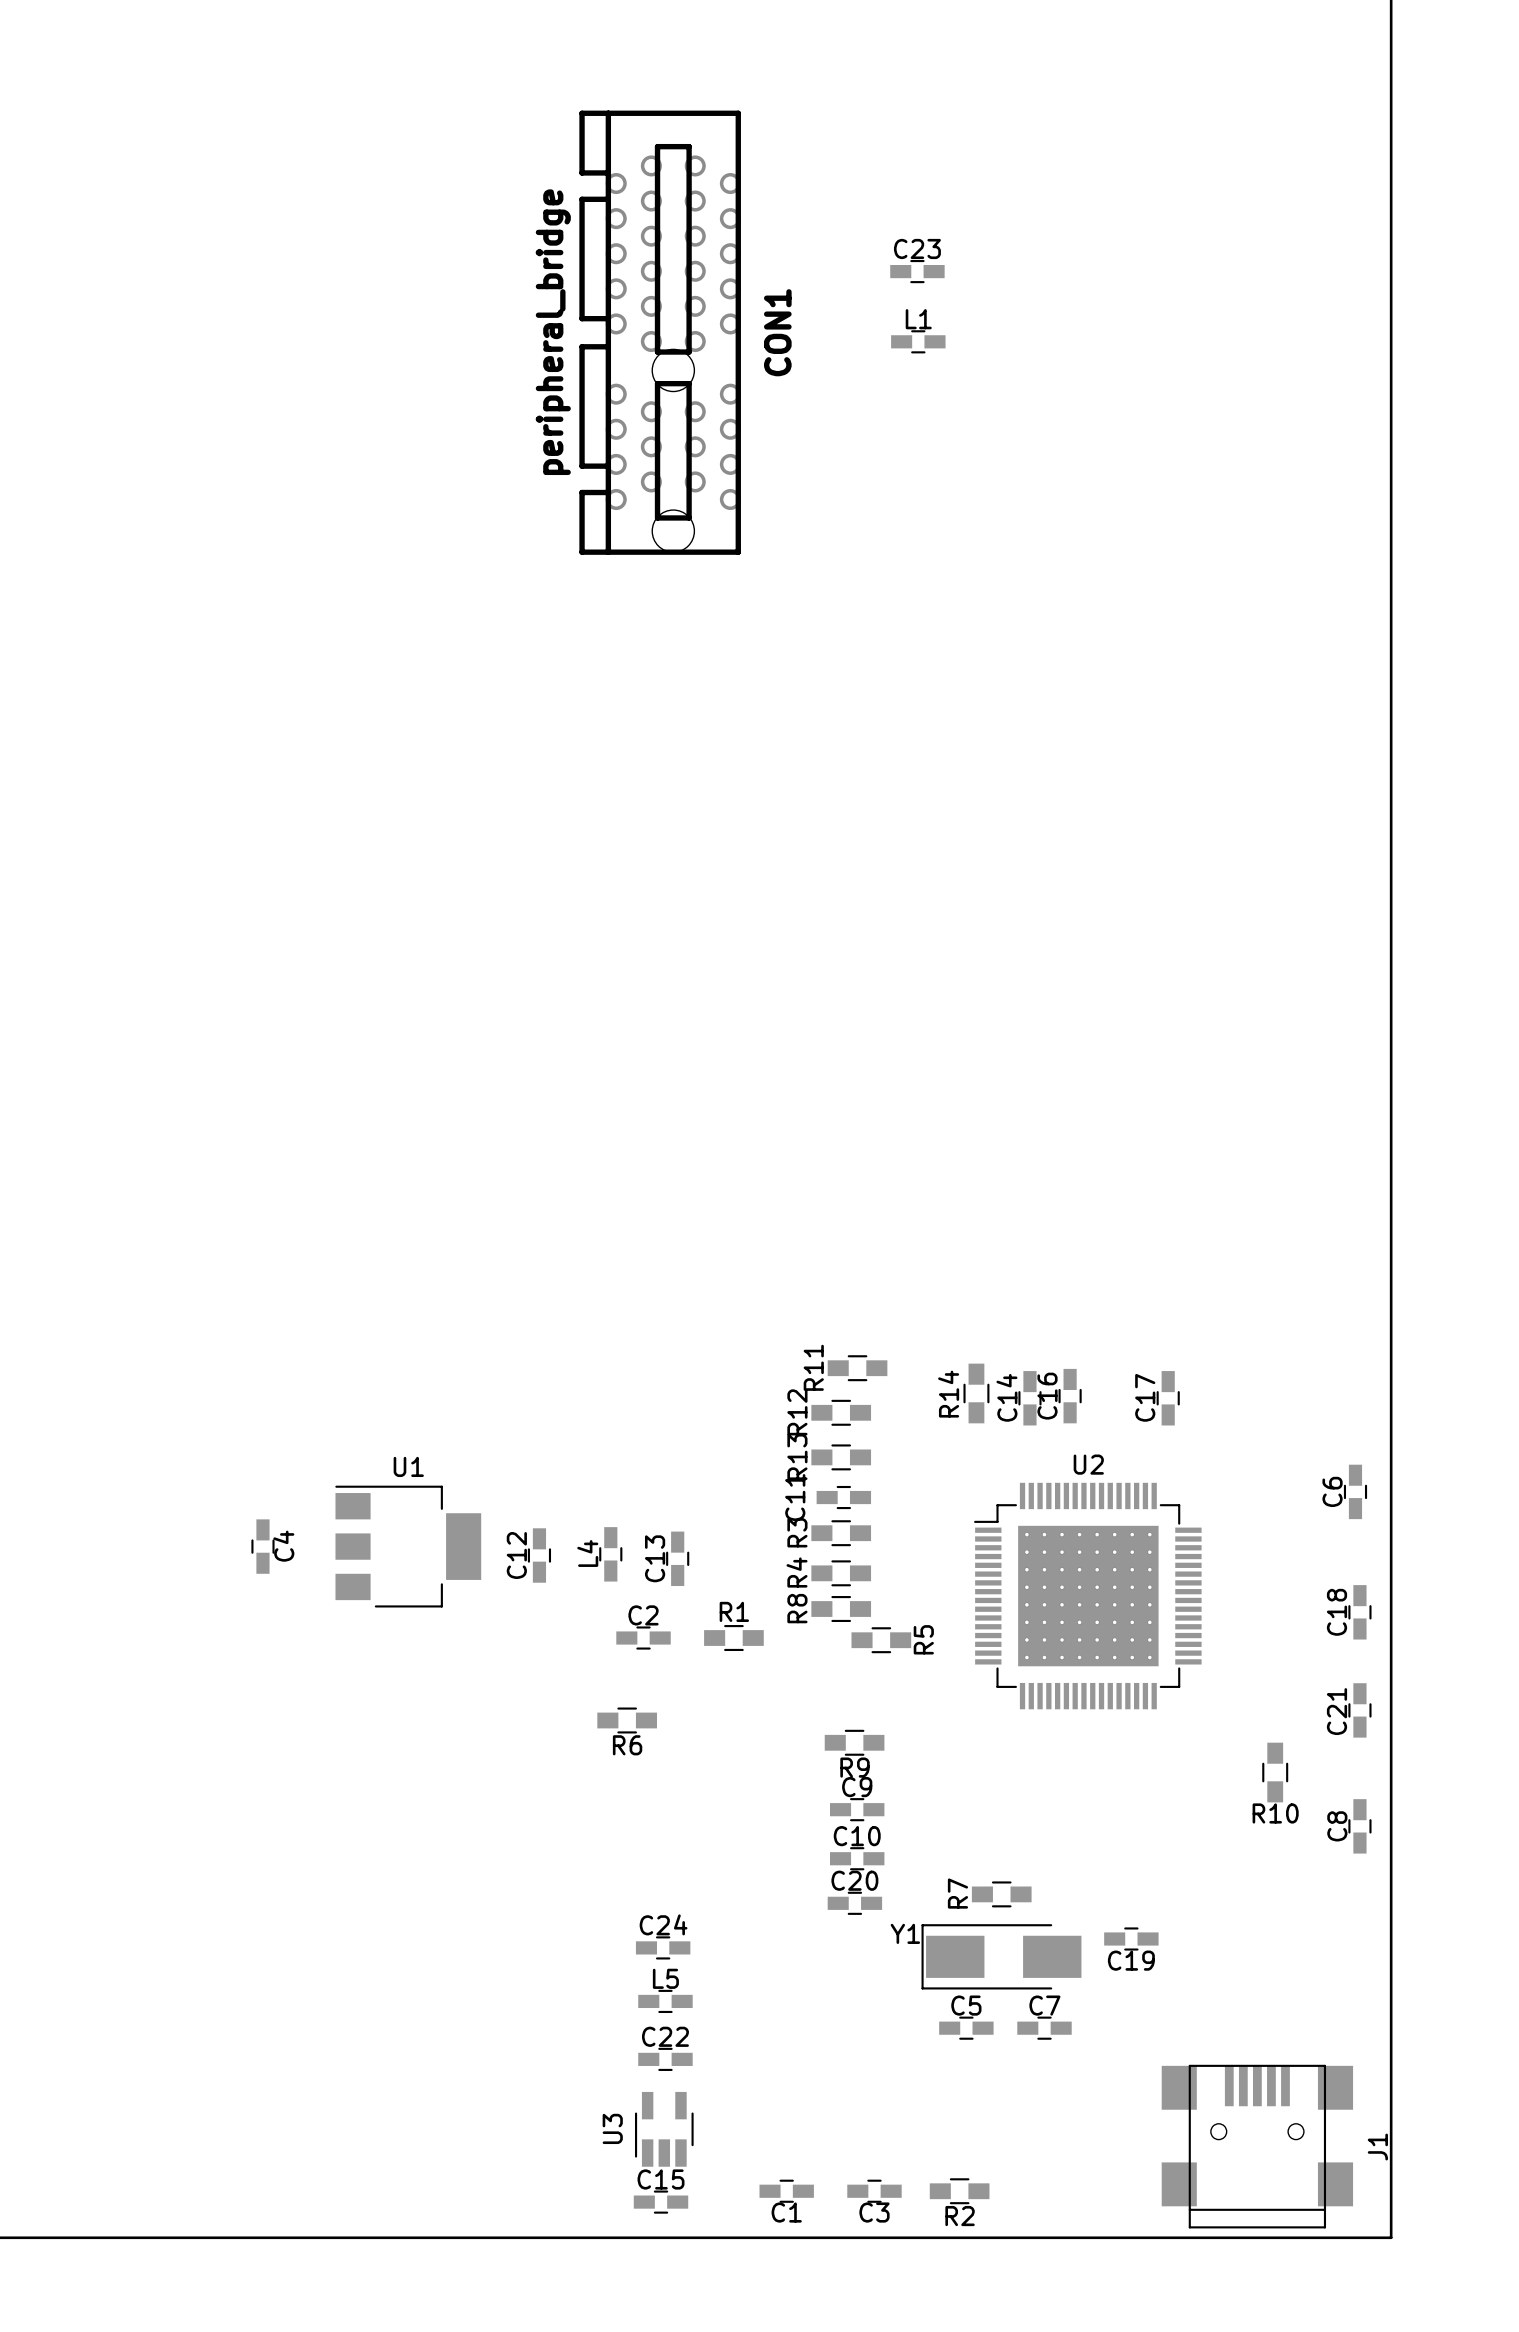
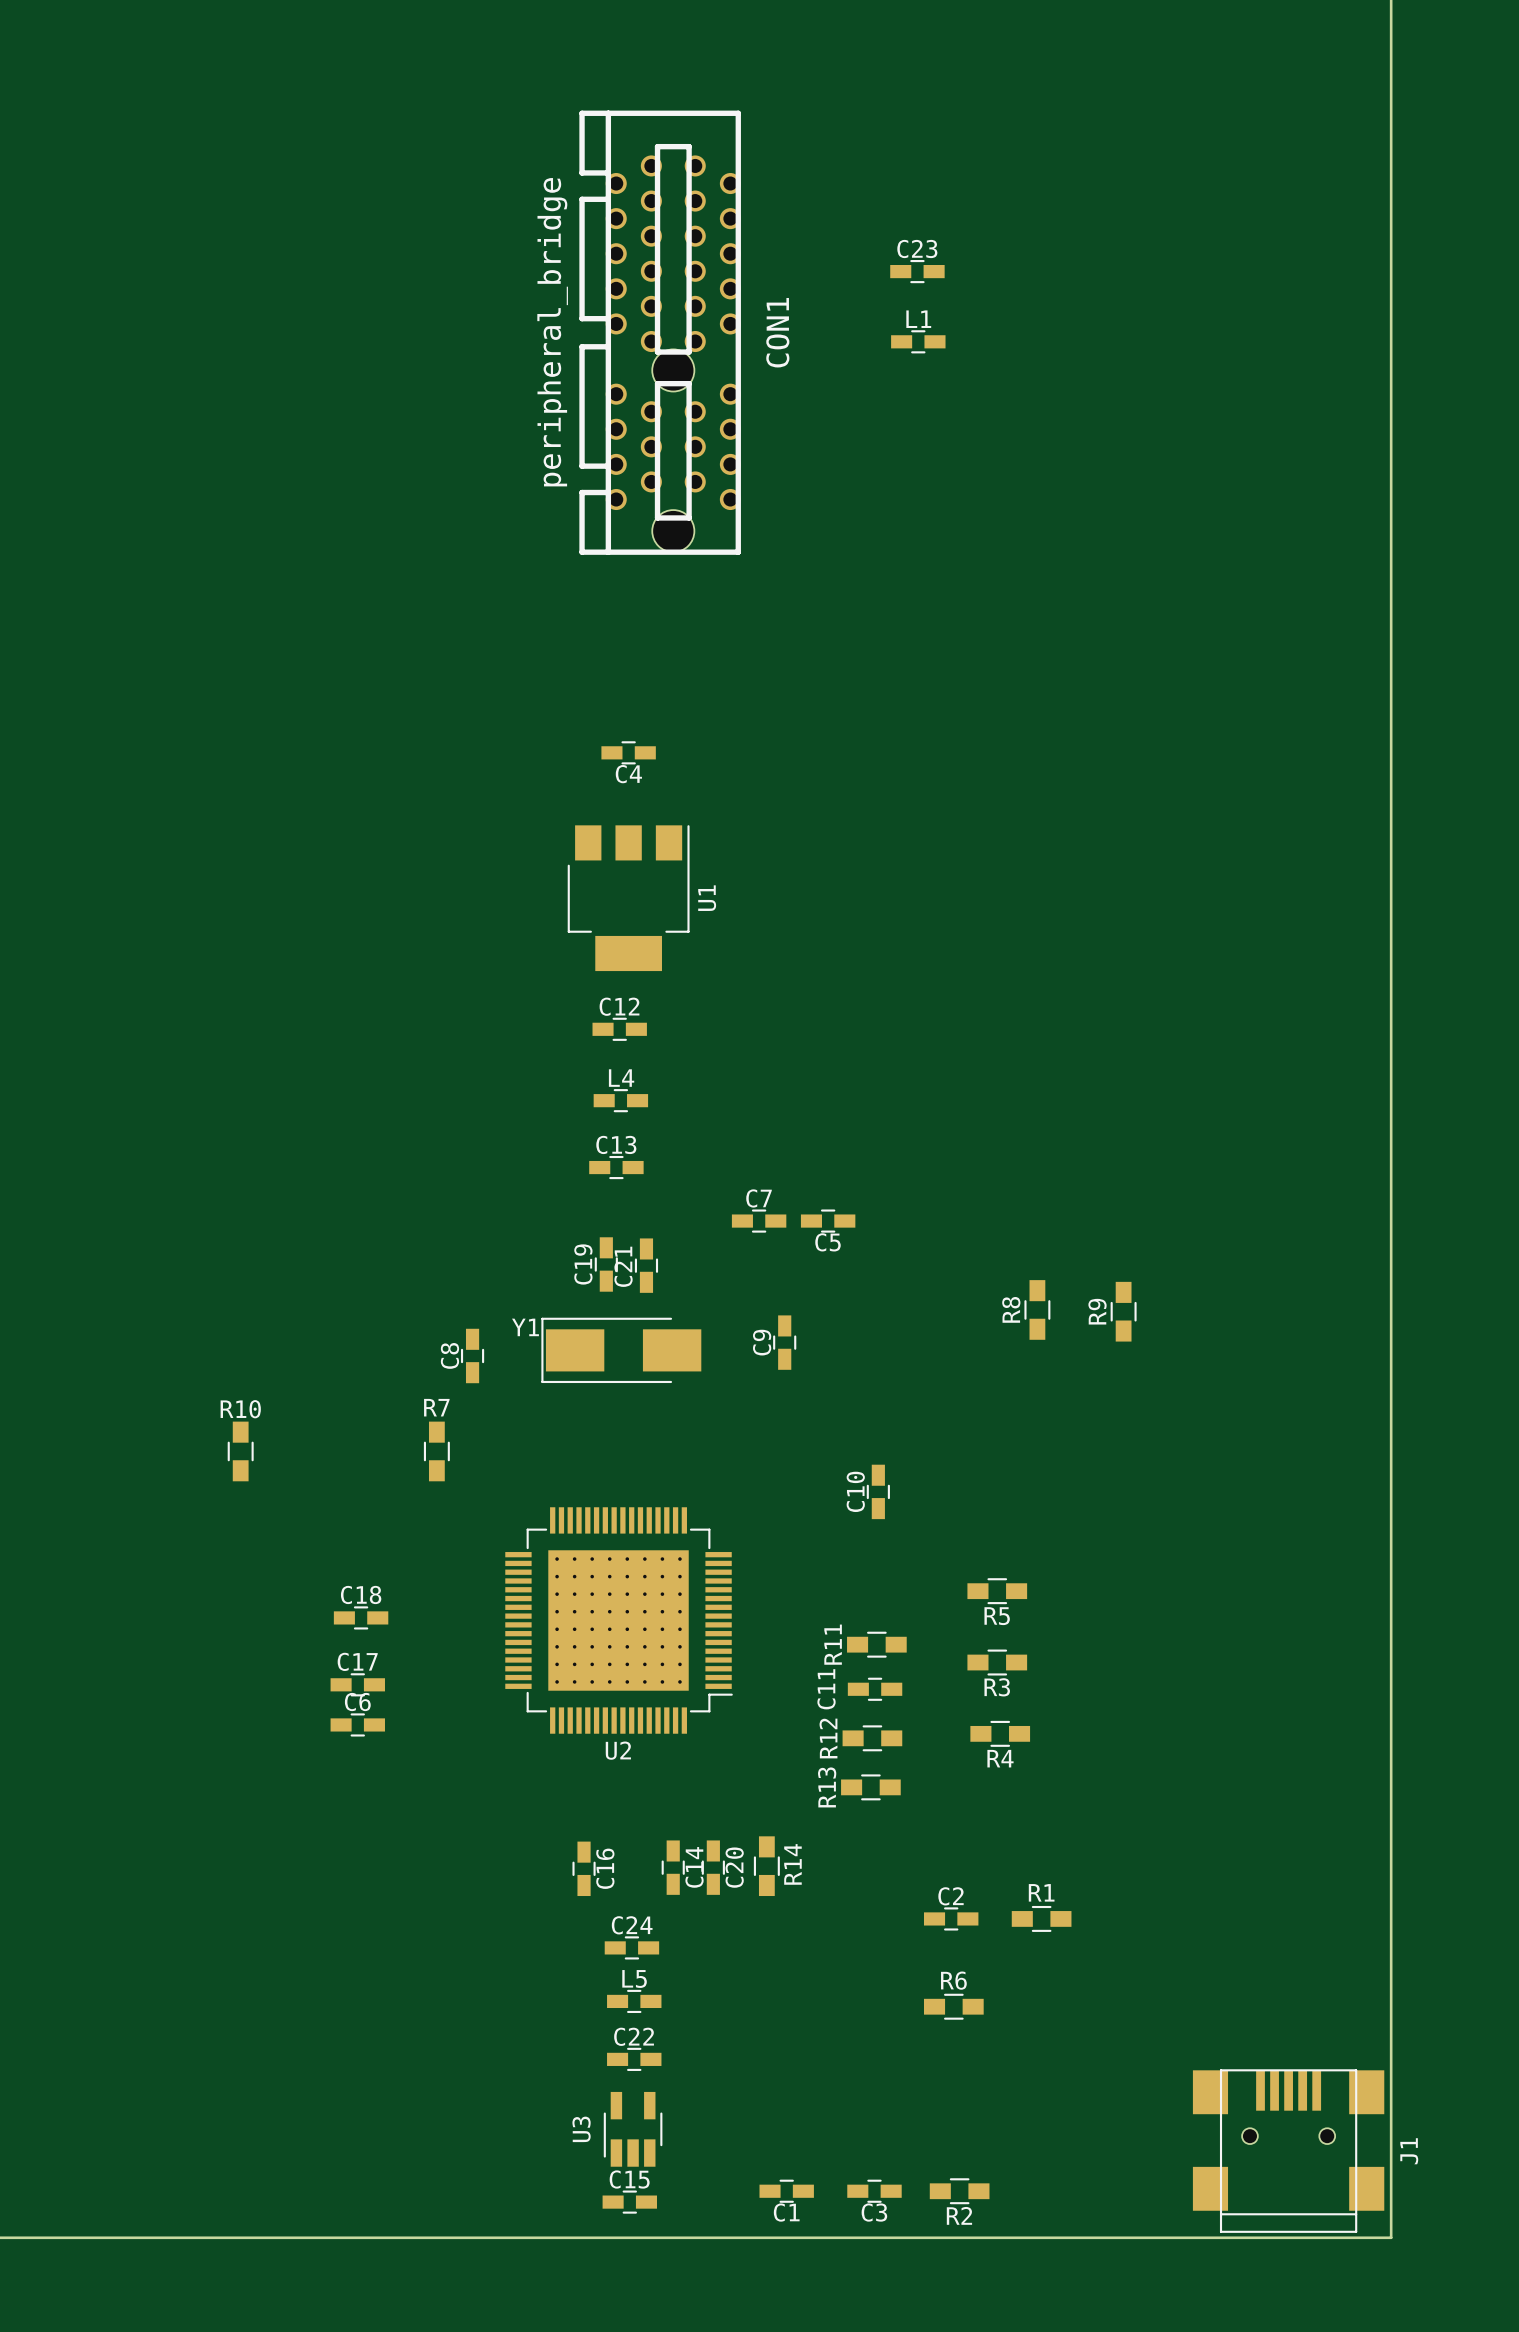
R11 position: (857, 1368) -> (876, 1644)
R14 position: (976, 1393) -> (766, 1866)
R14 name position: R14 (948, 1394) -> R14 (792, 1864)
C16 name position: C16 (1047, 1396) -> C16 (605, 1868)
C16 position: (1070, 1396) -> (584, 1868)
C14 name position: C14 (1006, 1397) -> C14 (694, 1867)
C14 position: (1029, 1398) -> (673, 1867)
C17 rotation: 0° (1168, 1398) -> 90° clockwise (357, 1684)
C17 position: (1168, 1398) -> (357, 1684)
R12 position: (841, 1412) -> (872, 1738)
R13 position: (841, 1457) -> (870, 1787)
C6 rotation: 0° (1355, 1491) -> 90° clockwise (357, 1724)
C6 position: (1355, 1491) -> (357, 1724)
C11 position: (843, 1497) -> (875, 1689)
R3 name rotation: 0° (797, 1532) -> 90° clockwise (997, 1687)
R3 name position: R3 (797, 1532) -> R3 (997, 1687)
R3 position: (841, 1533) -> (997, 1662)
C4 rotation: 0° (262, 1546) -> 90° clockwise (628, 752)
C4 position: (262, 1546) -> (628, 752)
U1 rotation: 0° (408, 1546) -> 90° clockwise (628, 898)
U1 position: (408, 1546) -> (628, 898)
L4 rotation: 0° (610, 1554) -> 90° clockwise (620, 1100)
L4 position: (610, 1554) -> (620, 1100)
C12 rotation: 0° (539, 1555) -> 90° clockwise (619, 1029)
C12 position: (539, 1555) -> (619, 1029)
C13 rotation: 0° (677, 1558) -> 90° clockwise (616, 1167)
C13 position: (677, 1558) -> (616, 1167)
R4 name rotation: 0° (797, 1572) -> 90° clockwise (1000, 1758)
R4 name position: R4 (797, 1572) -> R4 (1000, 1758)
R4 position: (841, 1573) -> (1000, 1733)
U2 rotation: 0° (1087, 1596) -> 180° (619, 1620)
U2 position: (1087, 1596) -> (619, 1620)
R8 rotation: 0° (841, 1609) -> 90° clockwise (1037, 1309)
R8 position: (841, 1609) -> (1037, 1309)
C18 rotation: 0° (1359, 1612) -> 90° clockwise (361, 1617)
C18 position: (1359, 1612) -> (361, 1617)
C2 position: (643, 1638) -> (951, 1918)
R1 position: (733, 1638) -> (1041, 1918)
R5 name rotation: 0° (923, 1639) -> 90° clockwise (997, 1616)
R5 name position: R5 (923, 1639) -> R5 (997, 1616)
R5 position: (881, 1640) -> (997, 1591)
C21 position: (1359, 1710) -> (646, 1265)
R6 position: (627, 1720) -> (953, 2006)
R9 rotation: 0° (854, 1742) -> 90° clockwise (1123, 1311)
R9 position: (854, 1742) -> (1123, 1311)
R6 name position: R6 (627, 1745) -> R6 (953, 1980)
R10 position: (1275, 1772) -> (240, 1451)
C9 rotation: 0° (857, 1809) -> 90° clockwise (784, 1342)
C9 position: (857, 1809) -> (784, 1342)
R10 name position: R10 (1275, 1813) -> R10 (240, 1409)
C8 position: (1359, 1826) -> (472, 1355)
C10 rotation: 0° (857, 1858) -> 90° clockwise (878, 1491)
C10 position: (857, 1858) -> (878, 1491)
R7 rotation: 0° (1001, 1894) -> 90° clockwise (436, 1451)
R7 position: (1001, 1894) -> (436, 1451)
C20 rotation: 0° (854, 1903) -> 90° clockwise (713, 1867)
C20 position: (854, 1903) -> (713, 1867)
C19 rotation: 0° (1131, 1938) -> 90° clockwise (606, 1264)
C19 position: (1131, 1938) -> (606, 1264)
C24 position: (663, 1947) -> (631, 1947)
Y1 position: (1001, 1956) -> (621, 1350)
L5 position: (665, 2001) -> (634, 2001)
C5 name position: C5 (966, 2005) -> C5 (827, 1242)
C5 position: (966, 2028) -> (828, 1221)
C7 position: (1044, 2028) -> (759, 1221)
C22 position: (665, 2059) -> (634, 2059)
U3 position: (664, 2129) -> (633, 2129)
J1 position: (1257, 2146) -> (1288, 2151)
C15 position: (661, 2202) -> (629, 2202)

